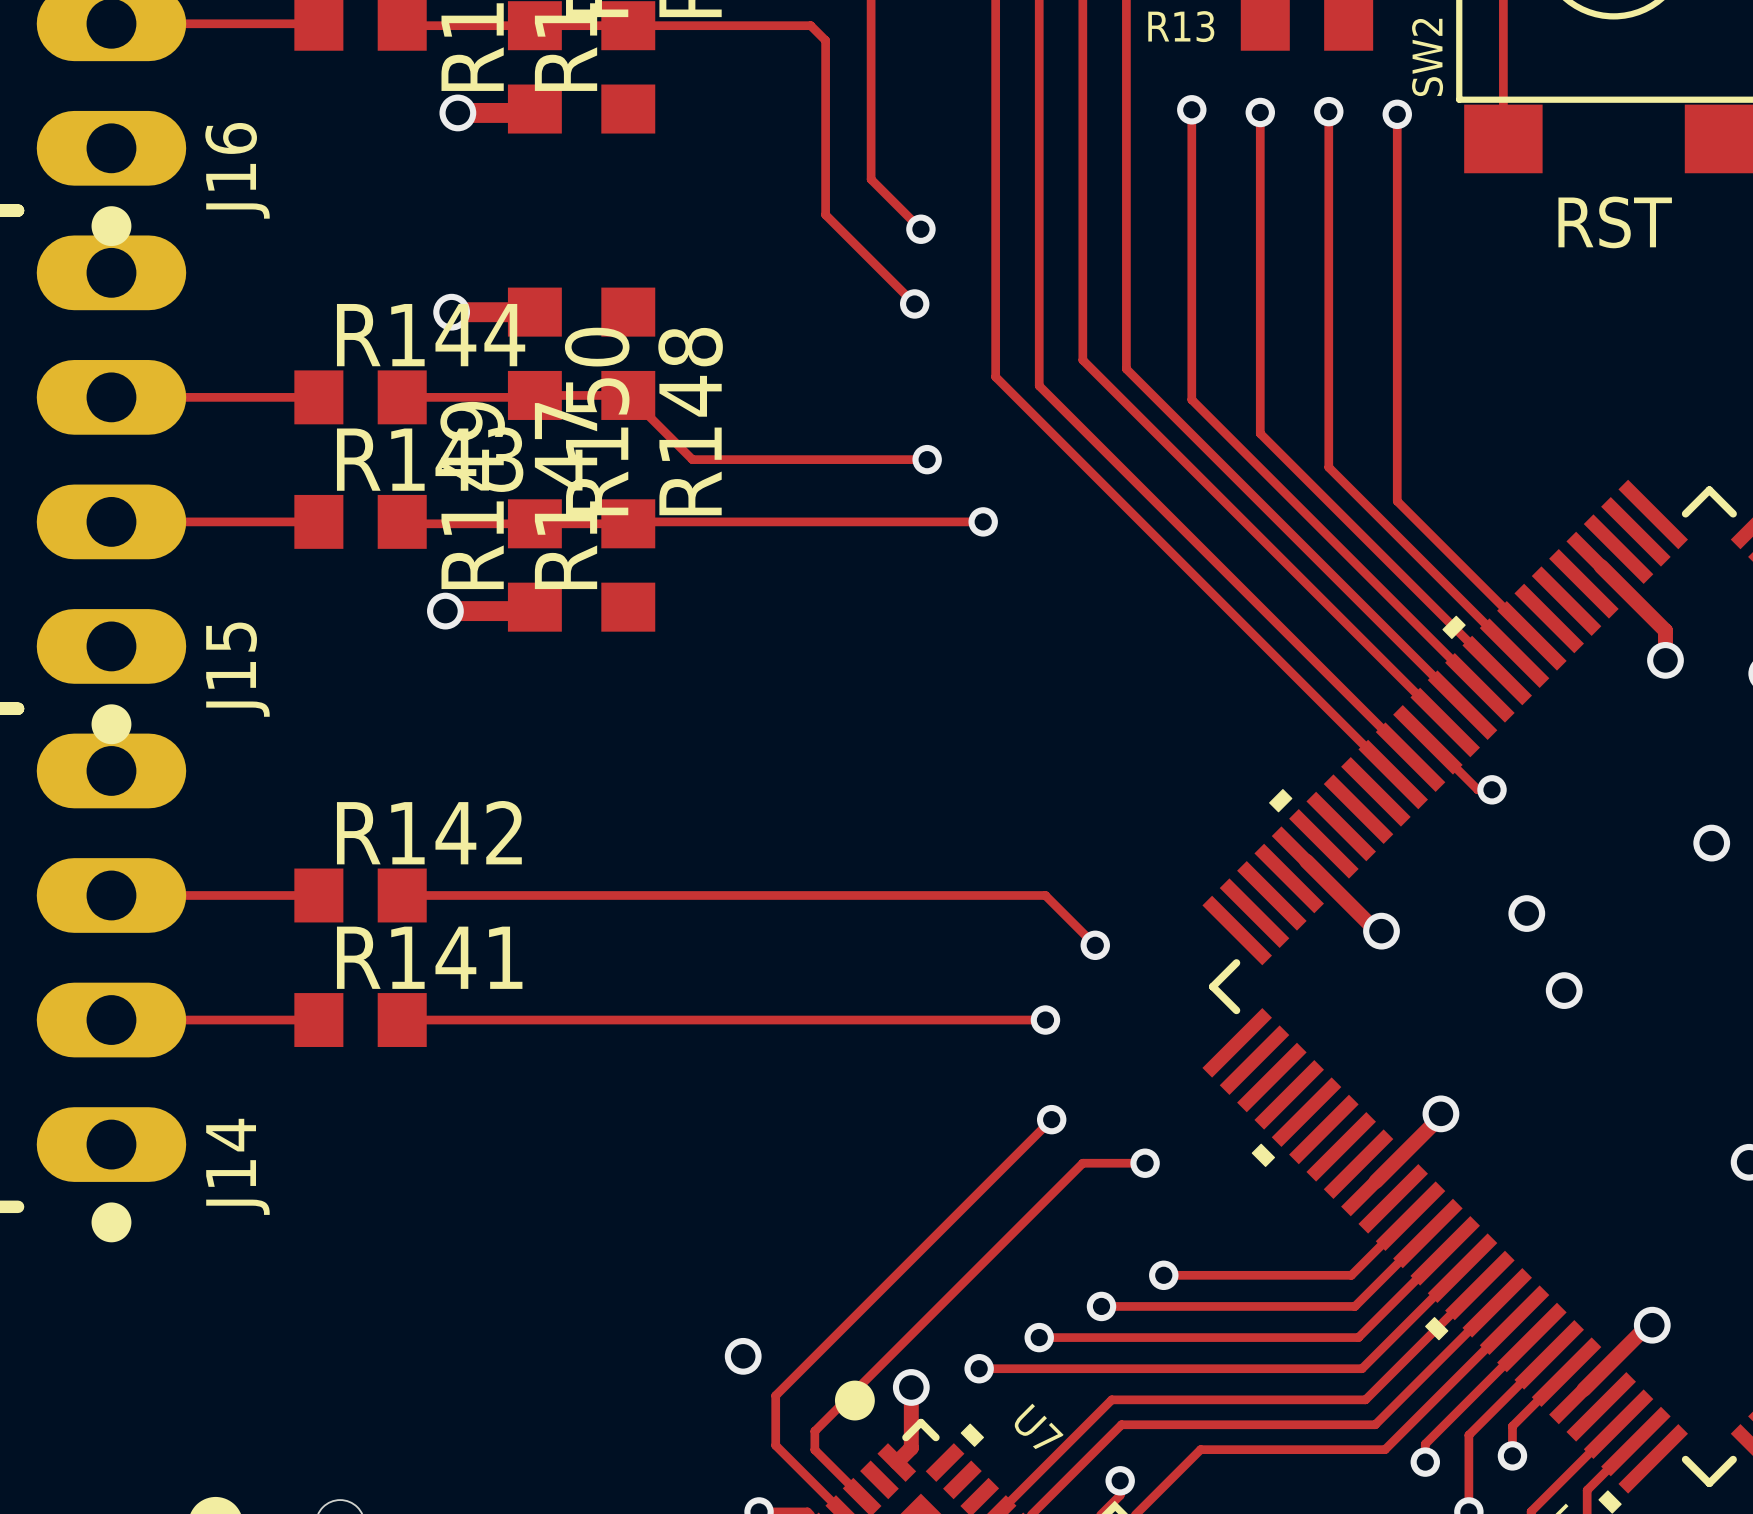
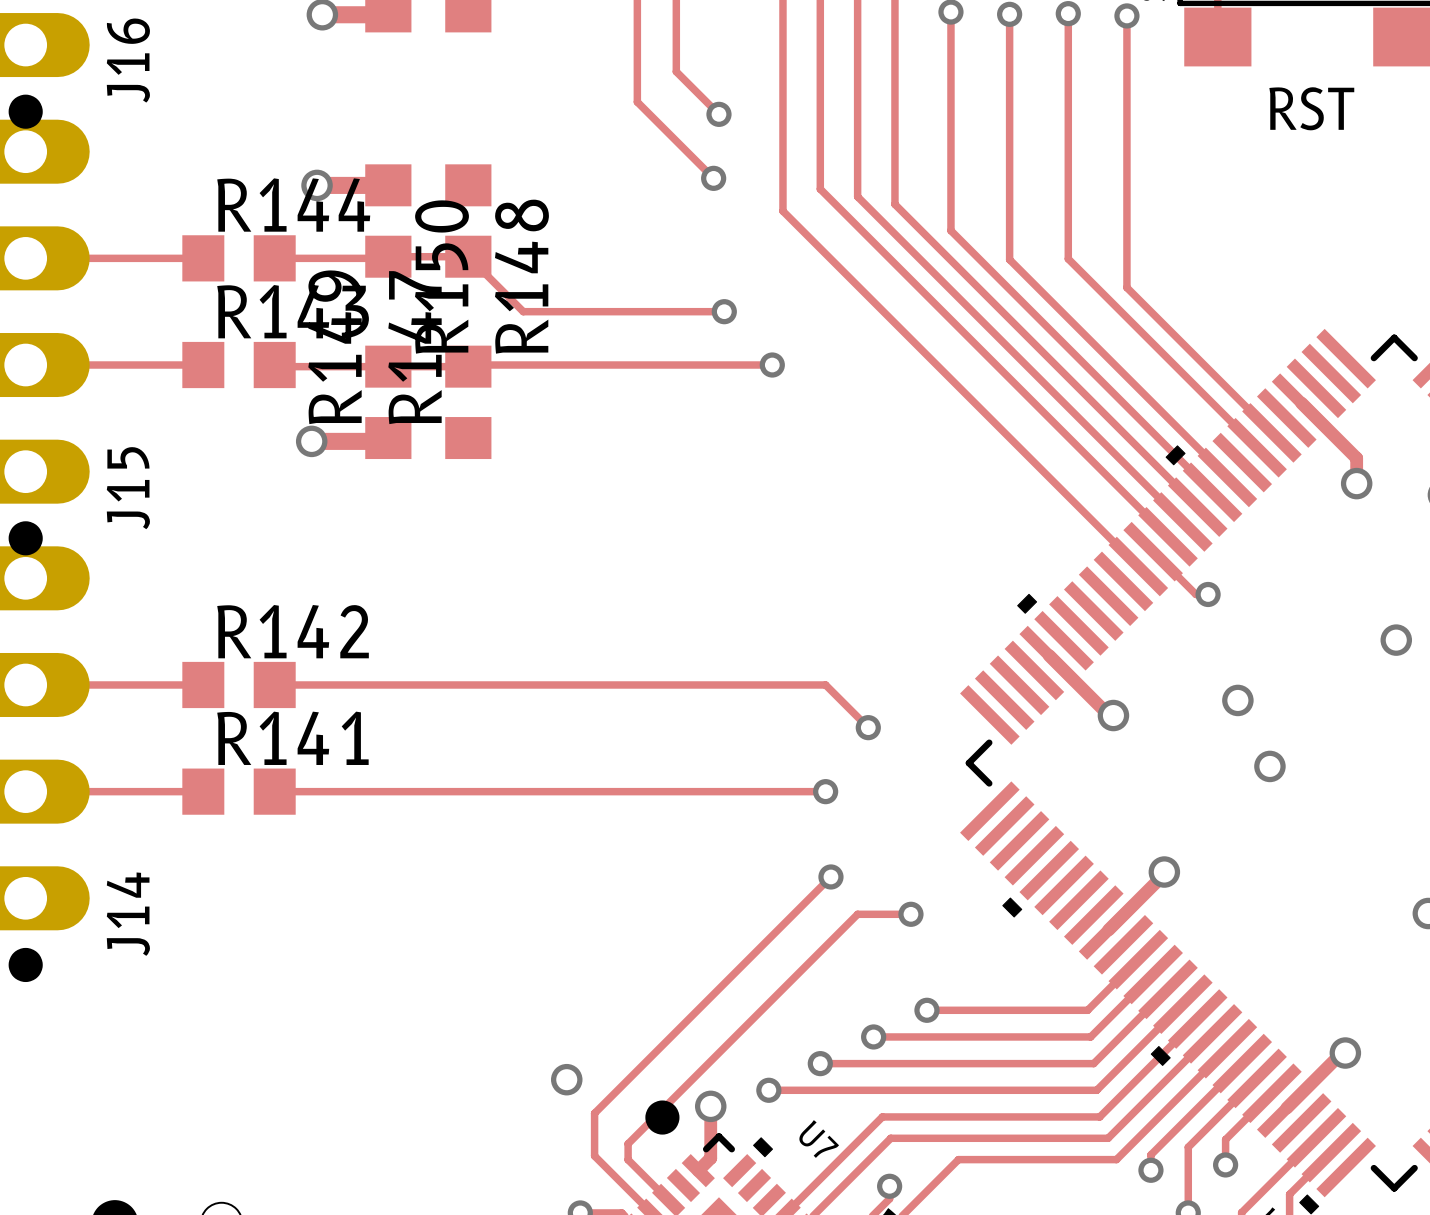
track: (1039, 316) (1039, 385) -> (782, 211) (820, 248)
track: (1082, 325) (1082, 360) -> (820, 189) (857, 226)
track: (1126, 334) (1126, 369) -> (857, 196) (894, 234)
track: (995, 342) (995, 376) (1393, 774) -> none
track: (1191, 365) (1191, 399) -> (894, 204) (950, 260)
track: (1260, 398) (1260, 433) -> (950, 230) (1009, 289)
track: (1328, 398) (1328, 467) -> (1009, 259) (1068, 318)
track: none -> (1068, 258) (1257, 447)
track: (1397, 431) (1397, 501) (1531, 635) -> (1126, 287) (1271, 432)

